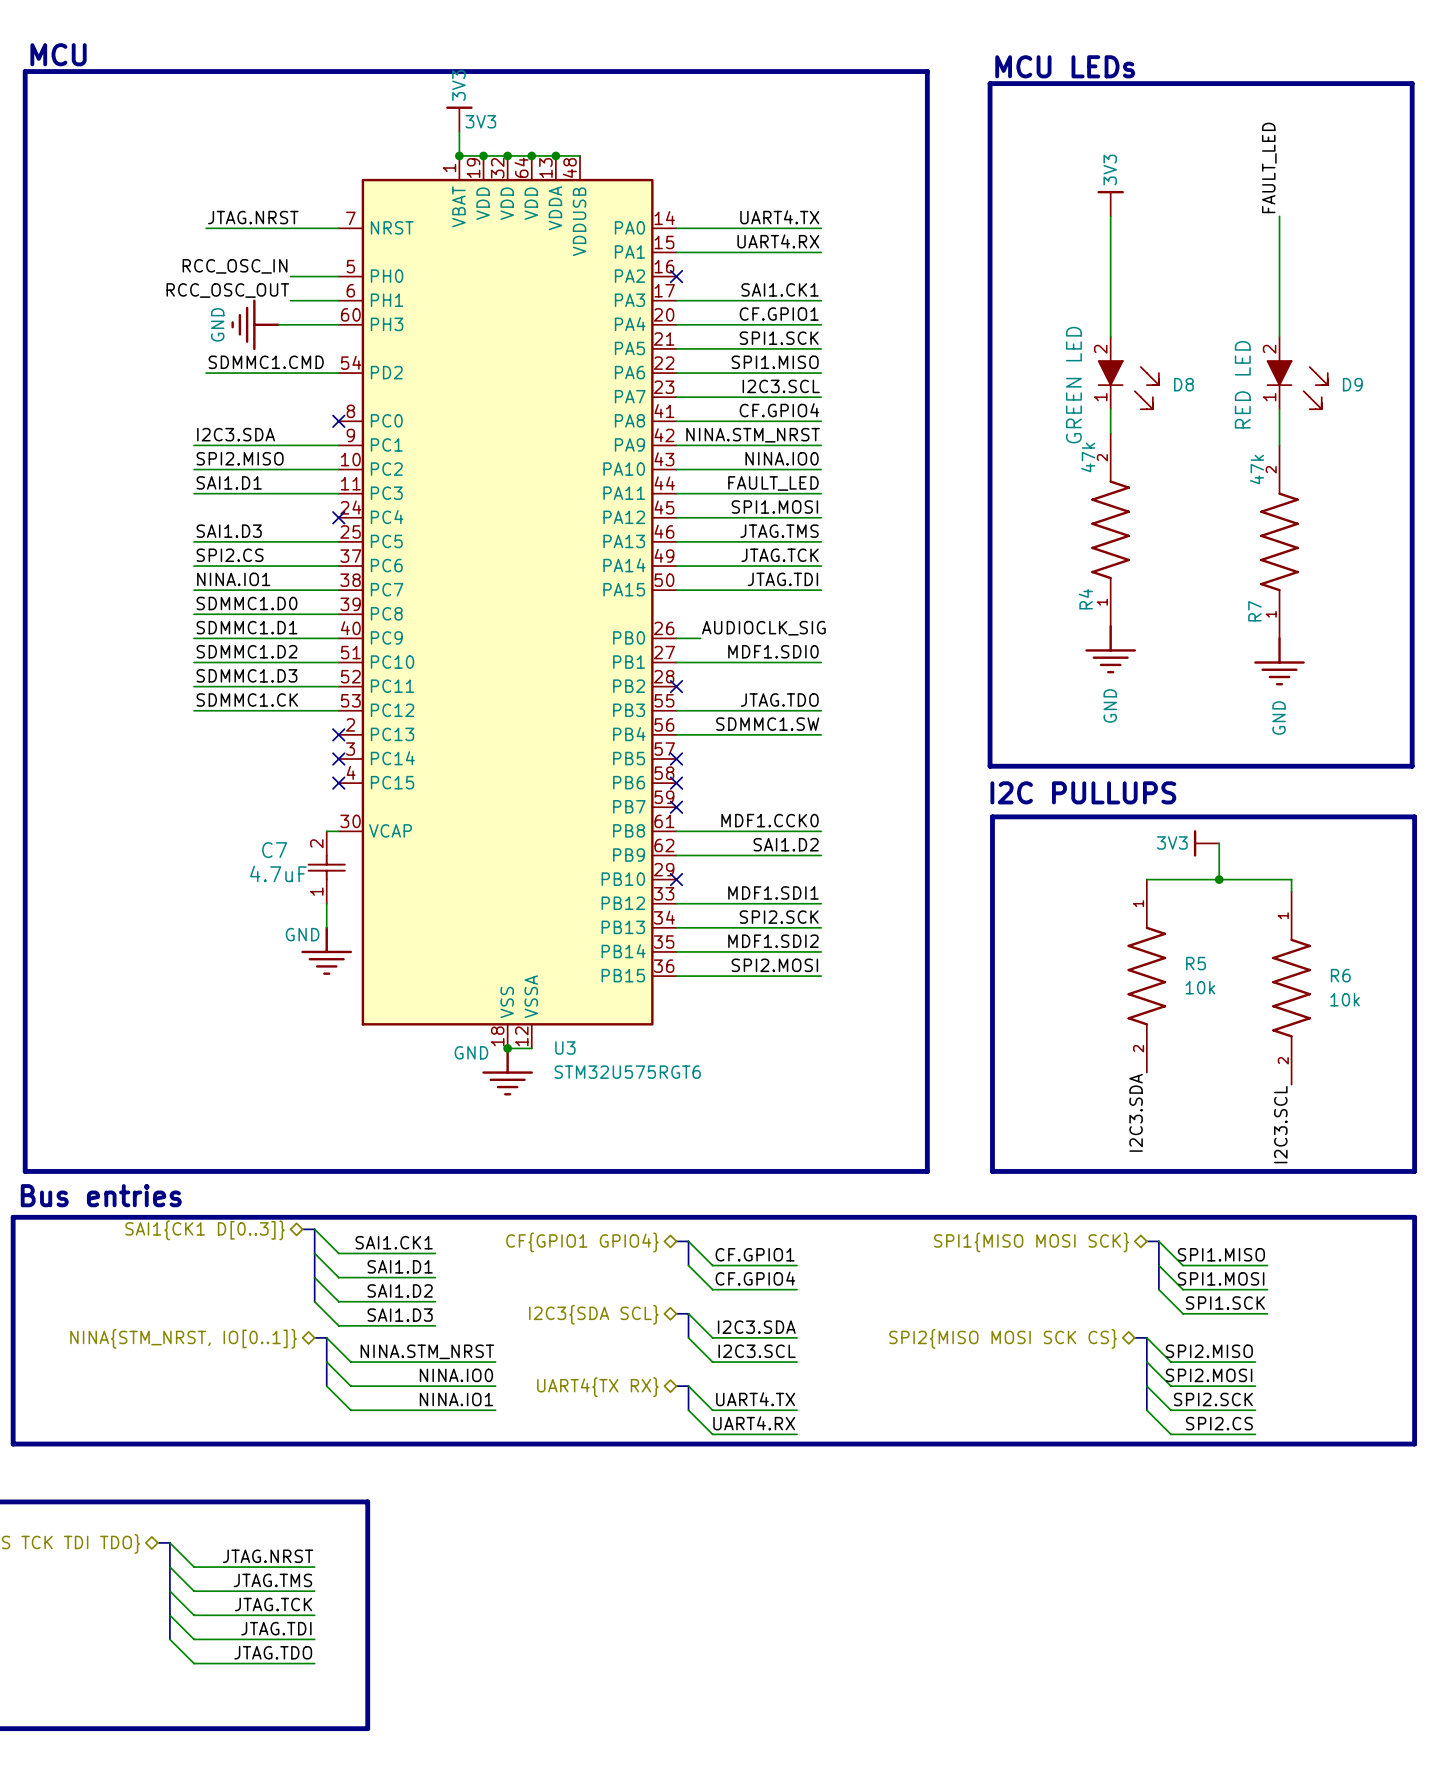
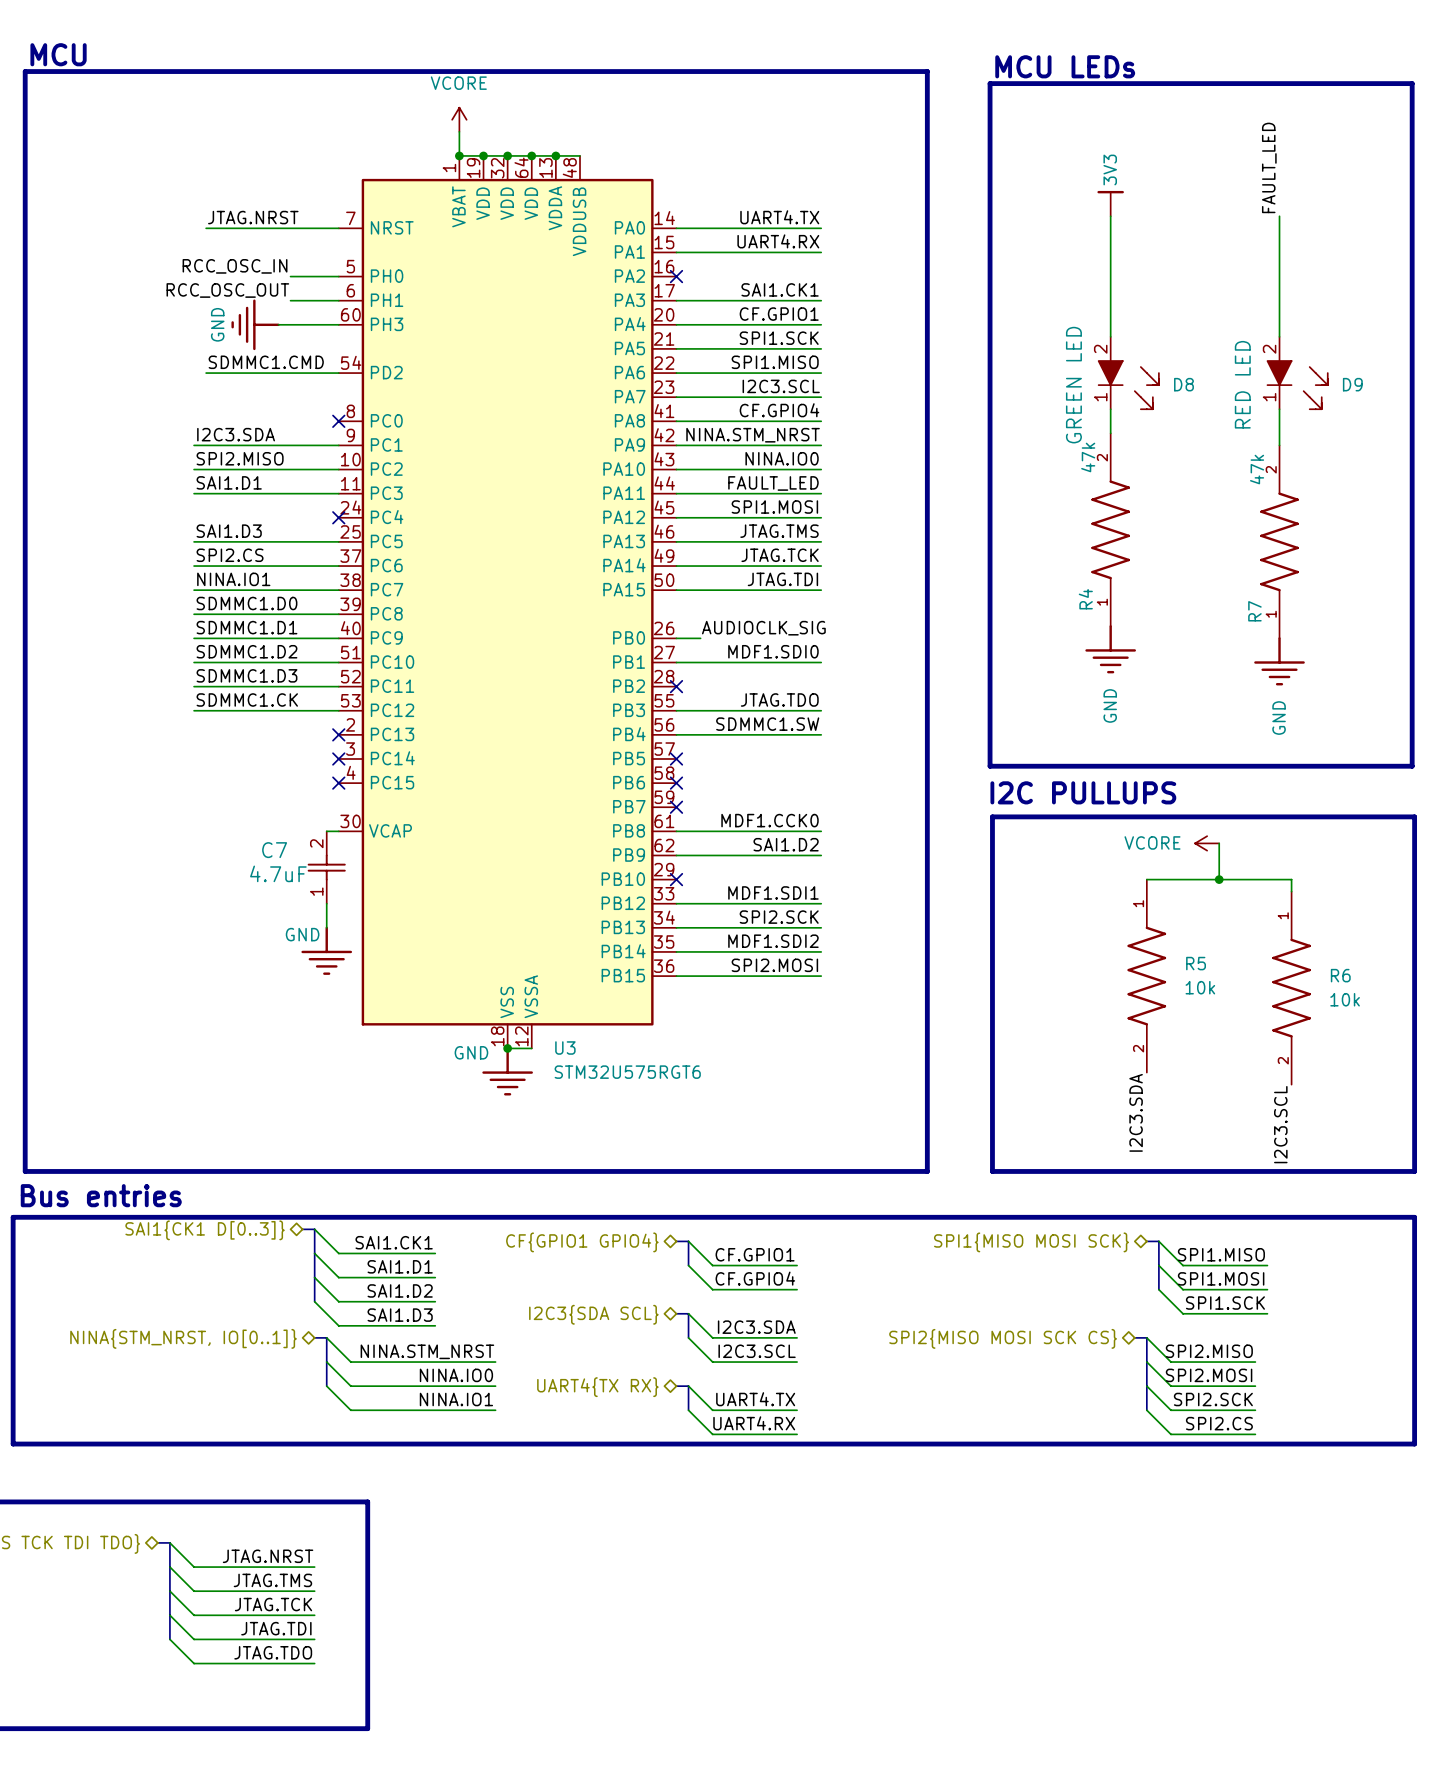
power symbol: 3V3 (459, 119) -> VCORE (459, 119)
power symbol shape: [1193, 830, 1220, 857] -> [1195, 836, 1220, 851]
power symbol text: none -> VCORE (1152, 842)

